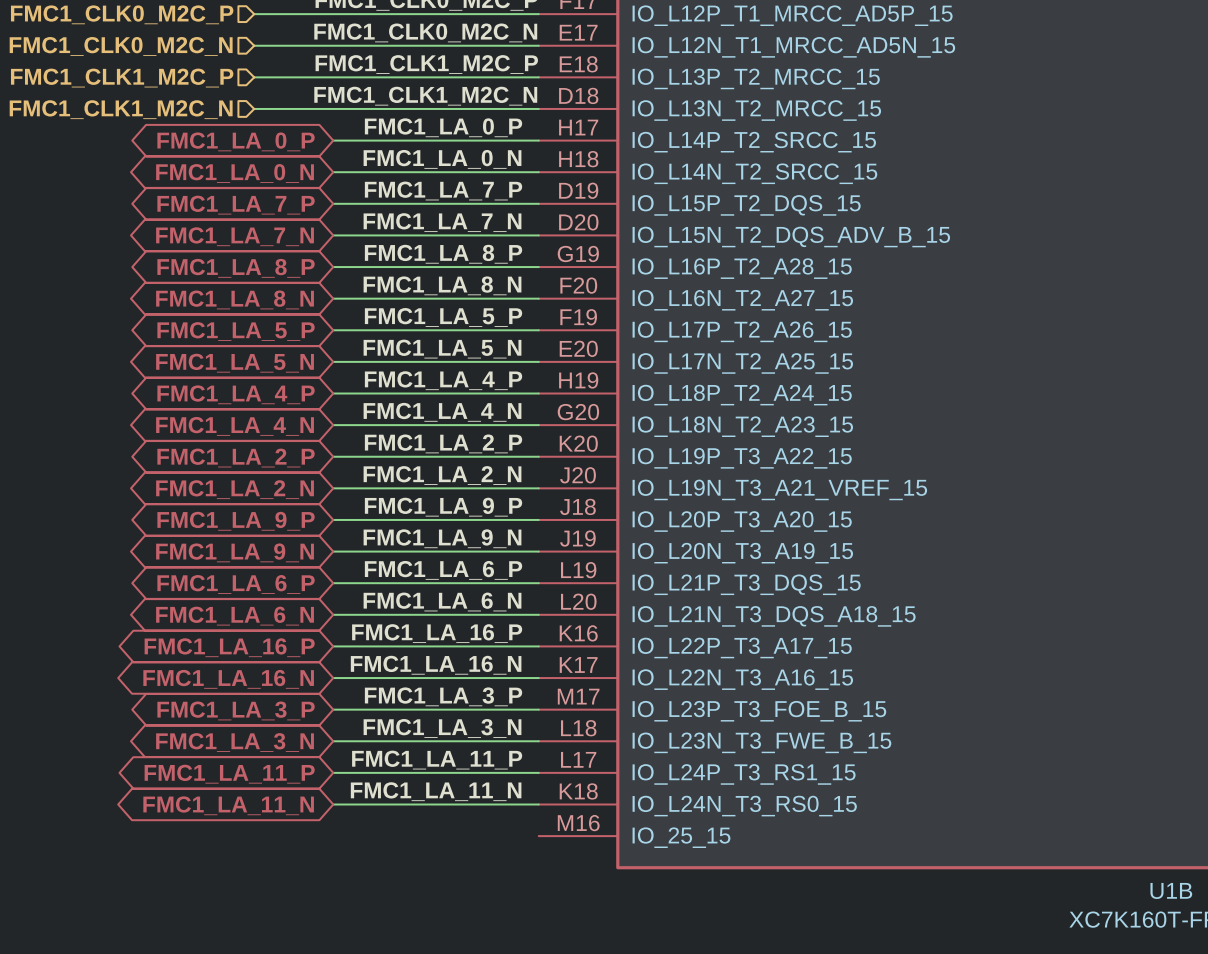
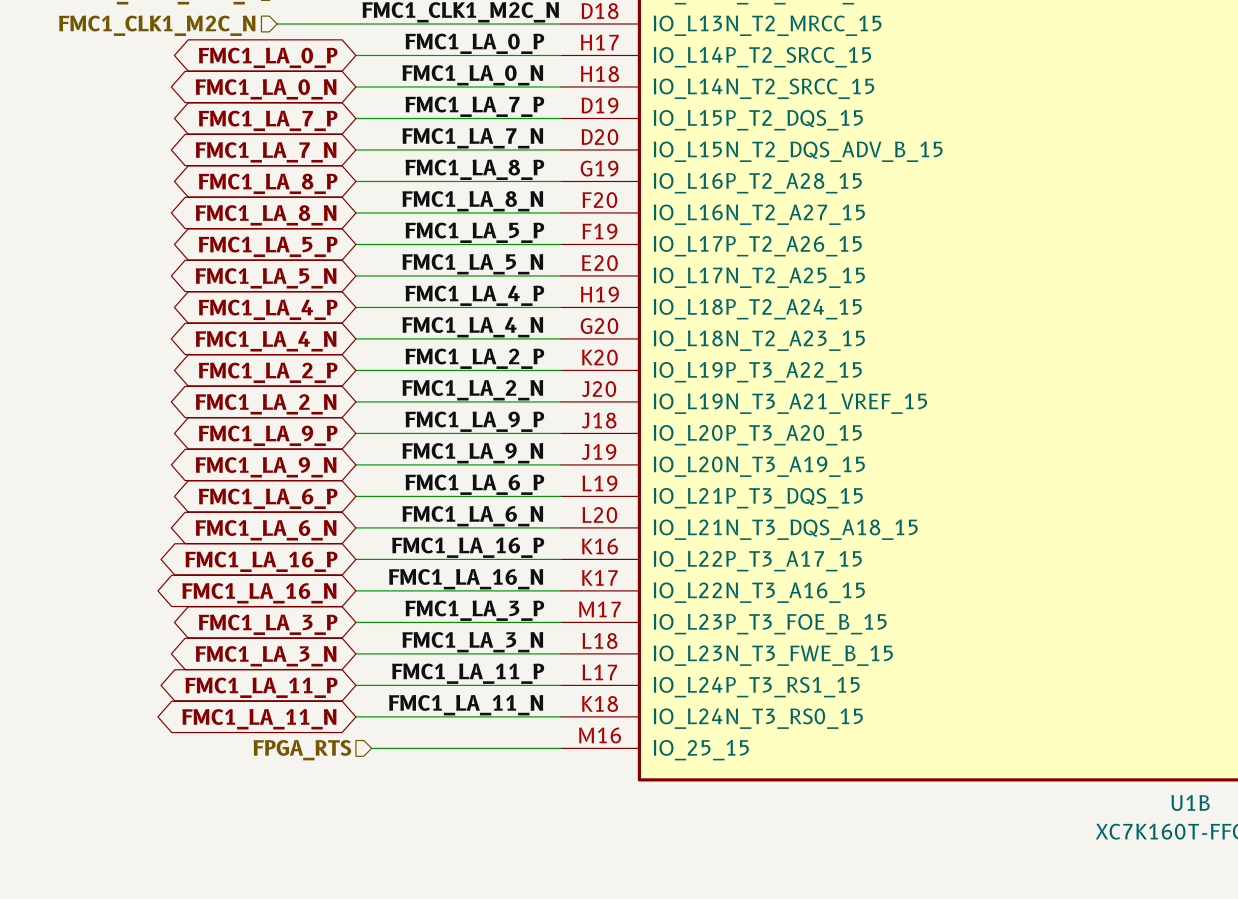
hierarchical label: none -> FPGA_RTS (302, 750)
wire: none -> (371, 748) (560, 748)

